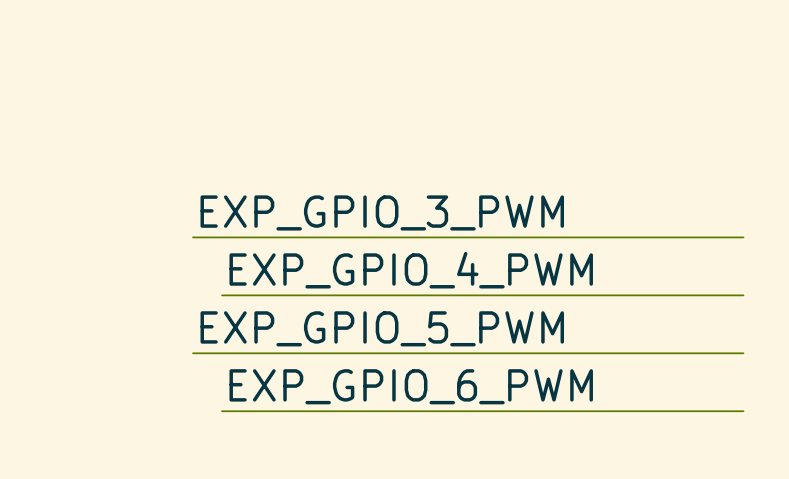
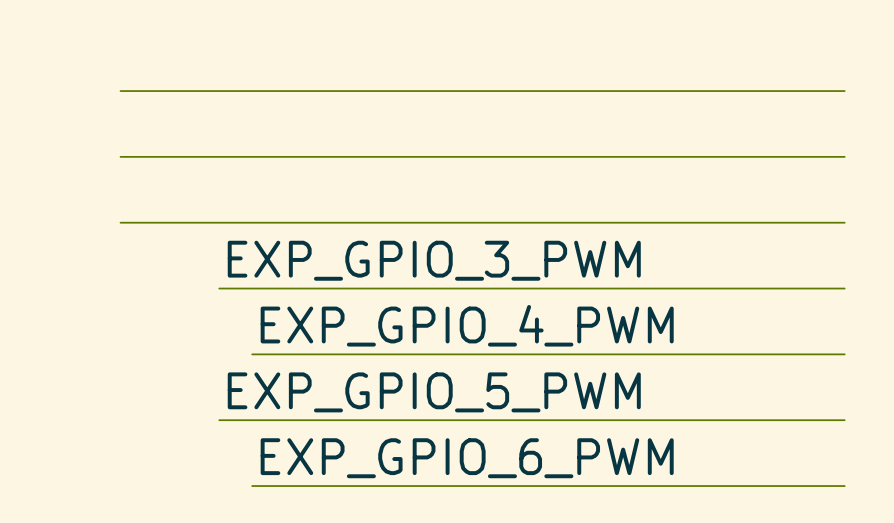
wire: none -> (120, 91) (844, 91)
wire: none -> (120, 156) (844, 156)
wire: none -> (120, 222) (844, 222)

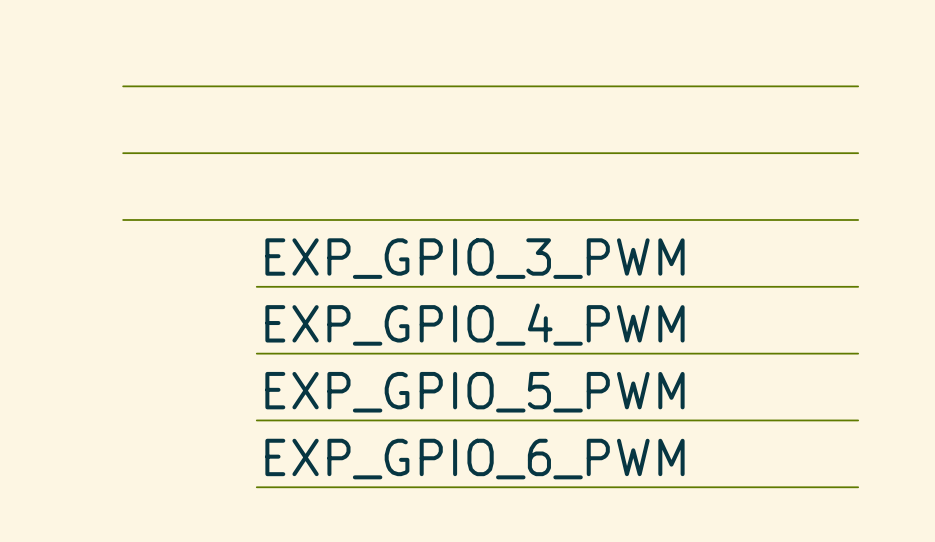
label position: EXP_GPIO_3_PWM (434, 260) -> EXP_GPIO_3_PWM (474, 258)
wire: (219, 288) (252, 288) -> none
label position: EXP_GPIO_5_PWM (434, 392) -> EXP_GPIO_5_PWM (474, 392)
wire: (219, 420) (252, 420) -> none

